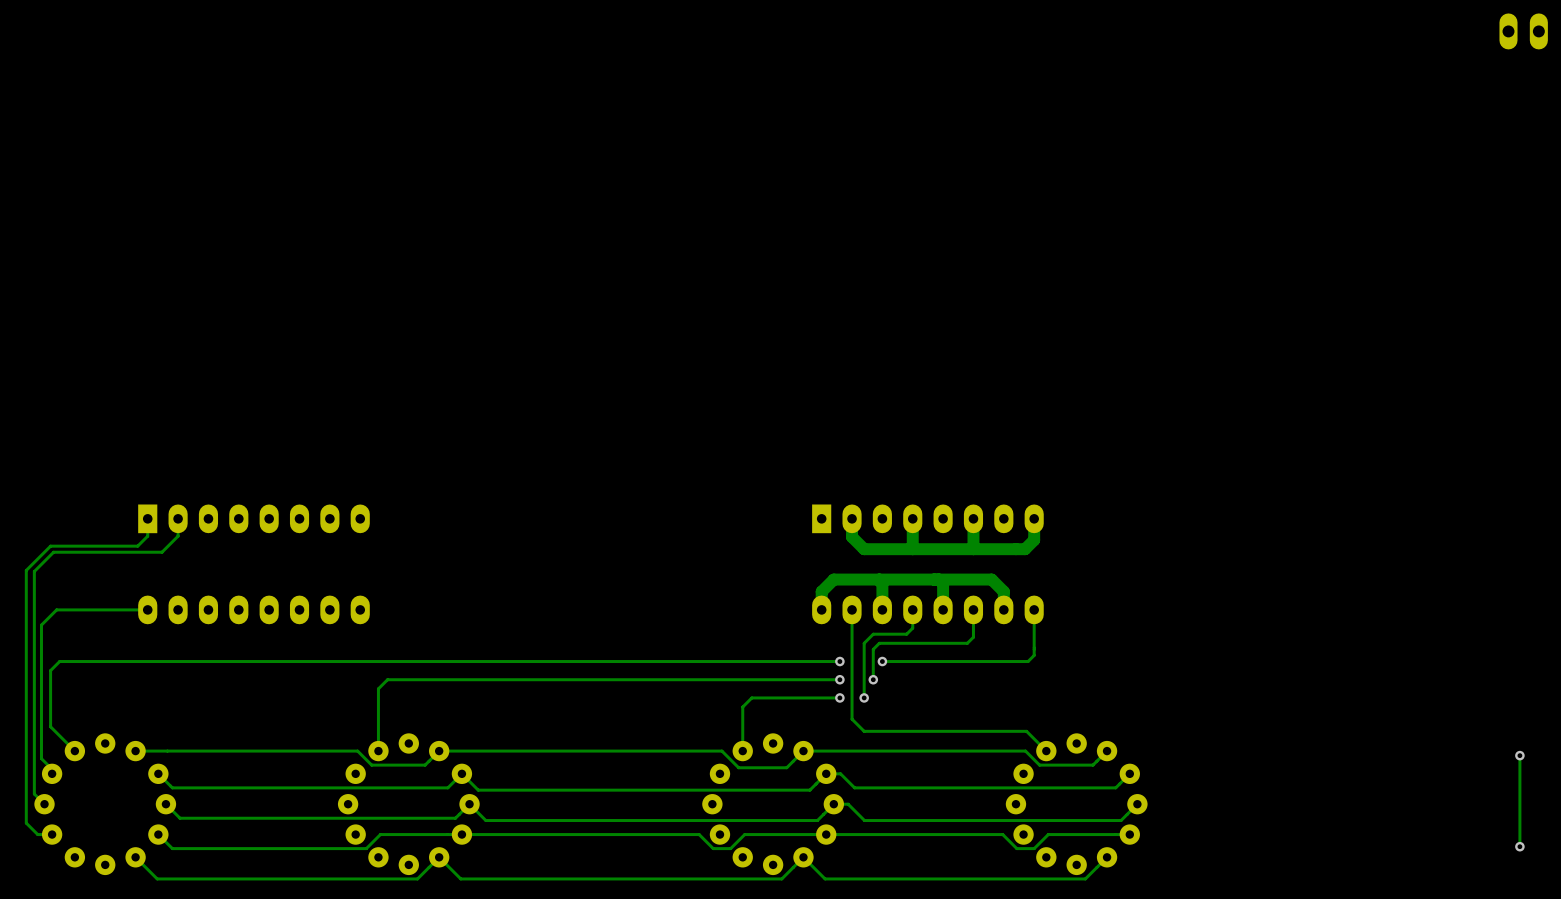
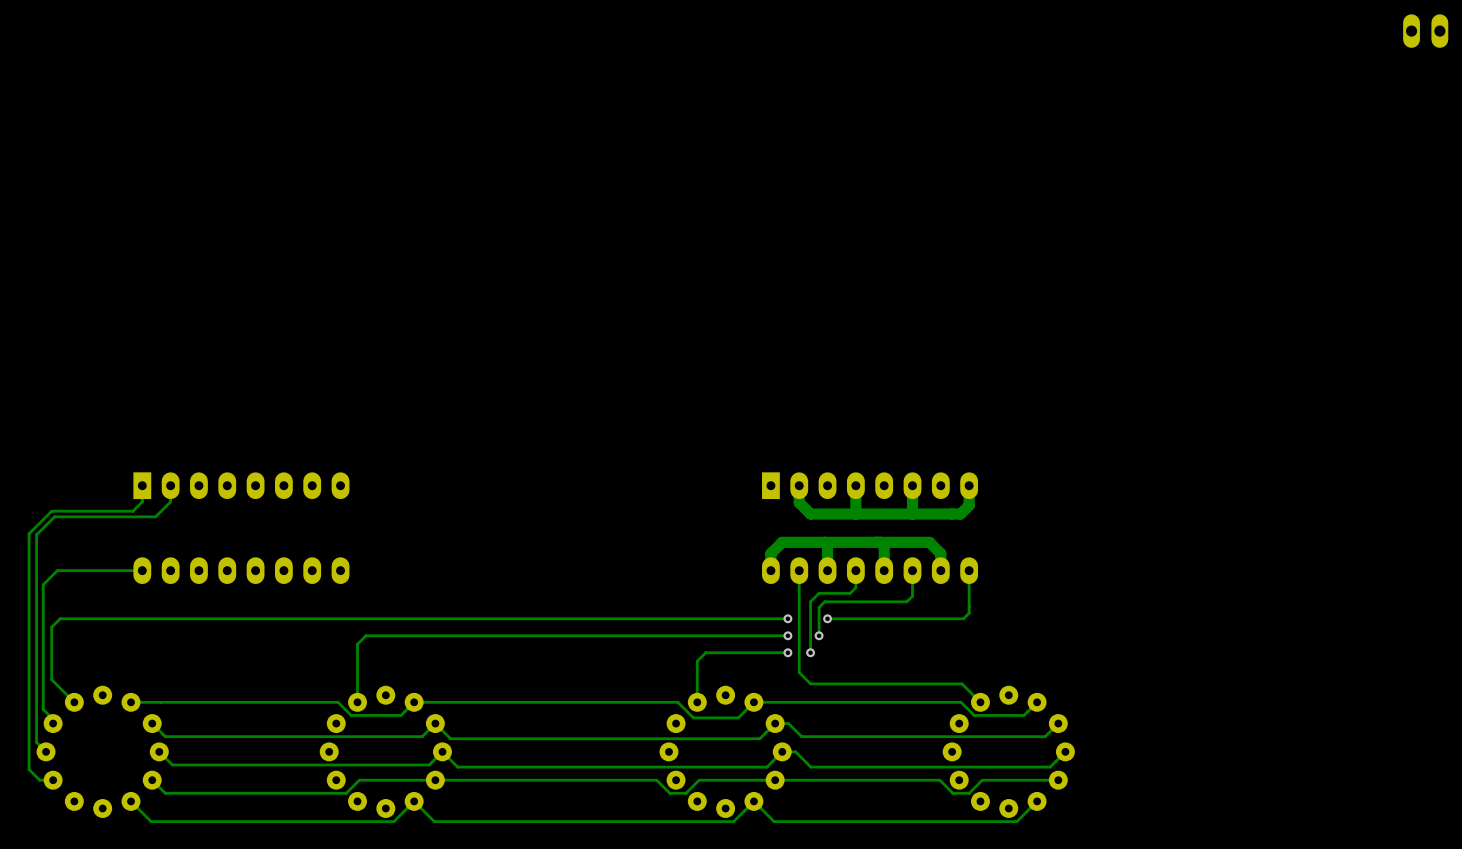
track: (1519, 755) (1519, 846) -> none
via: (1519, 755) -> none
via: (1519, 846) -> none

